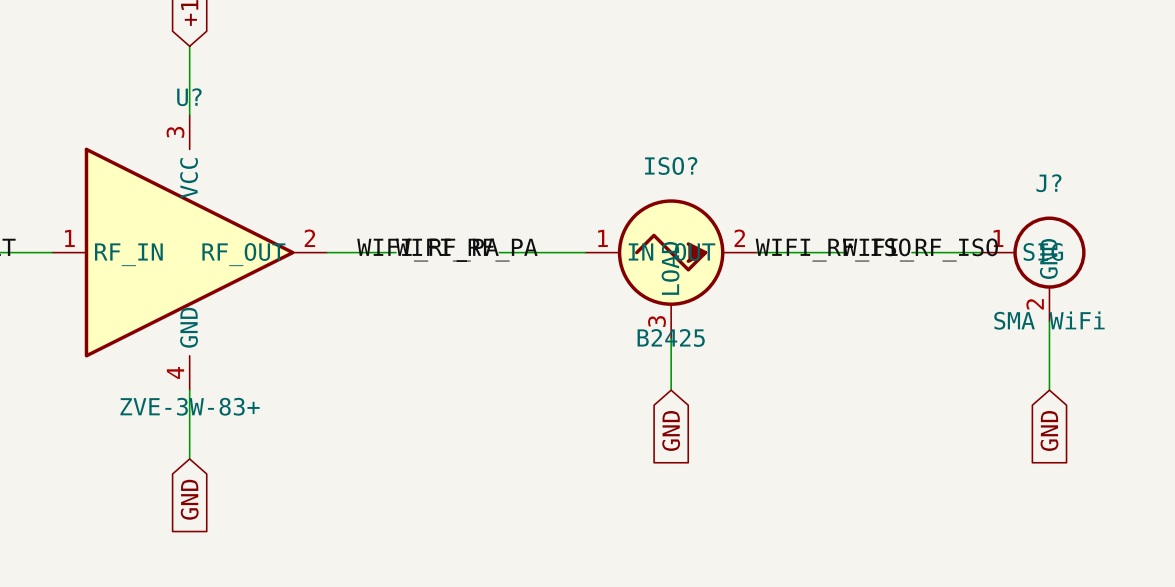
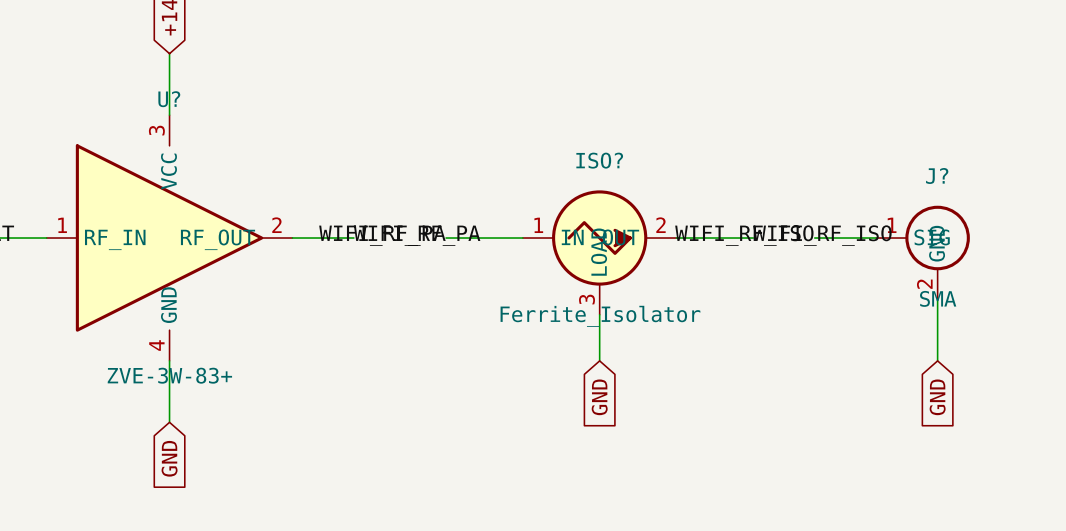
J? value: SMA WiFi (1049, 320) -> SMA (938, 298)
ISO? value: B2425 (671, 337) -> Ferrite_Isolator (600, 316)

